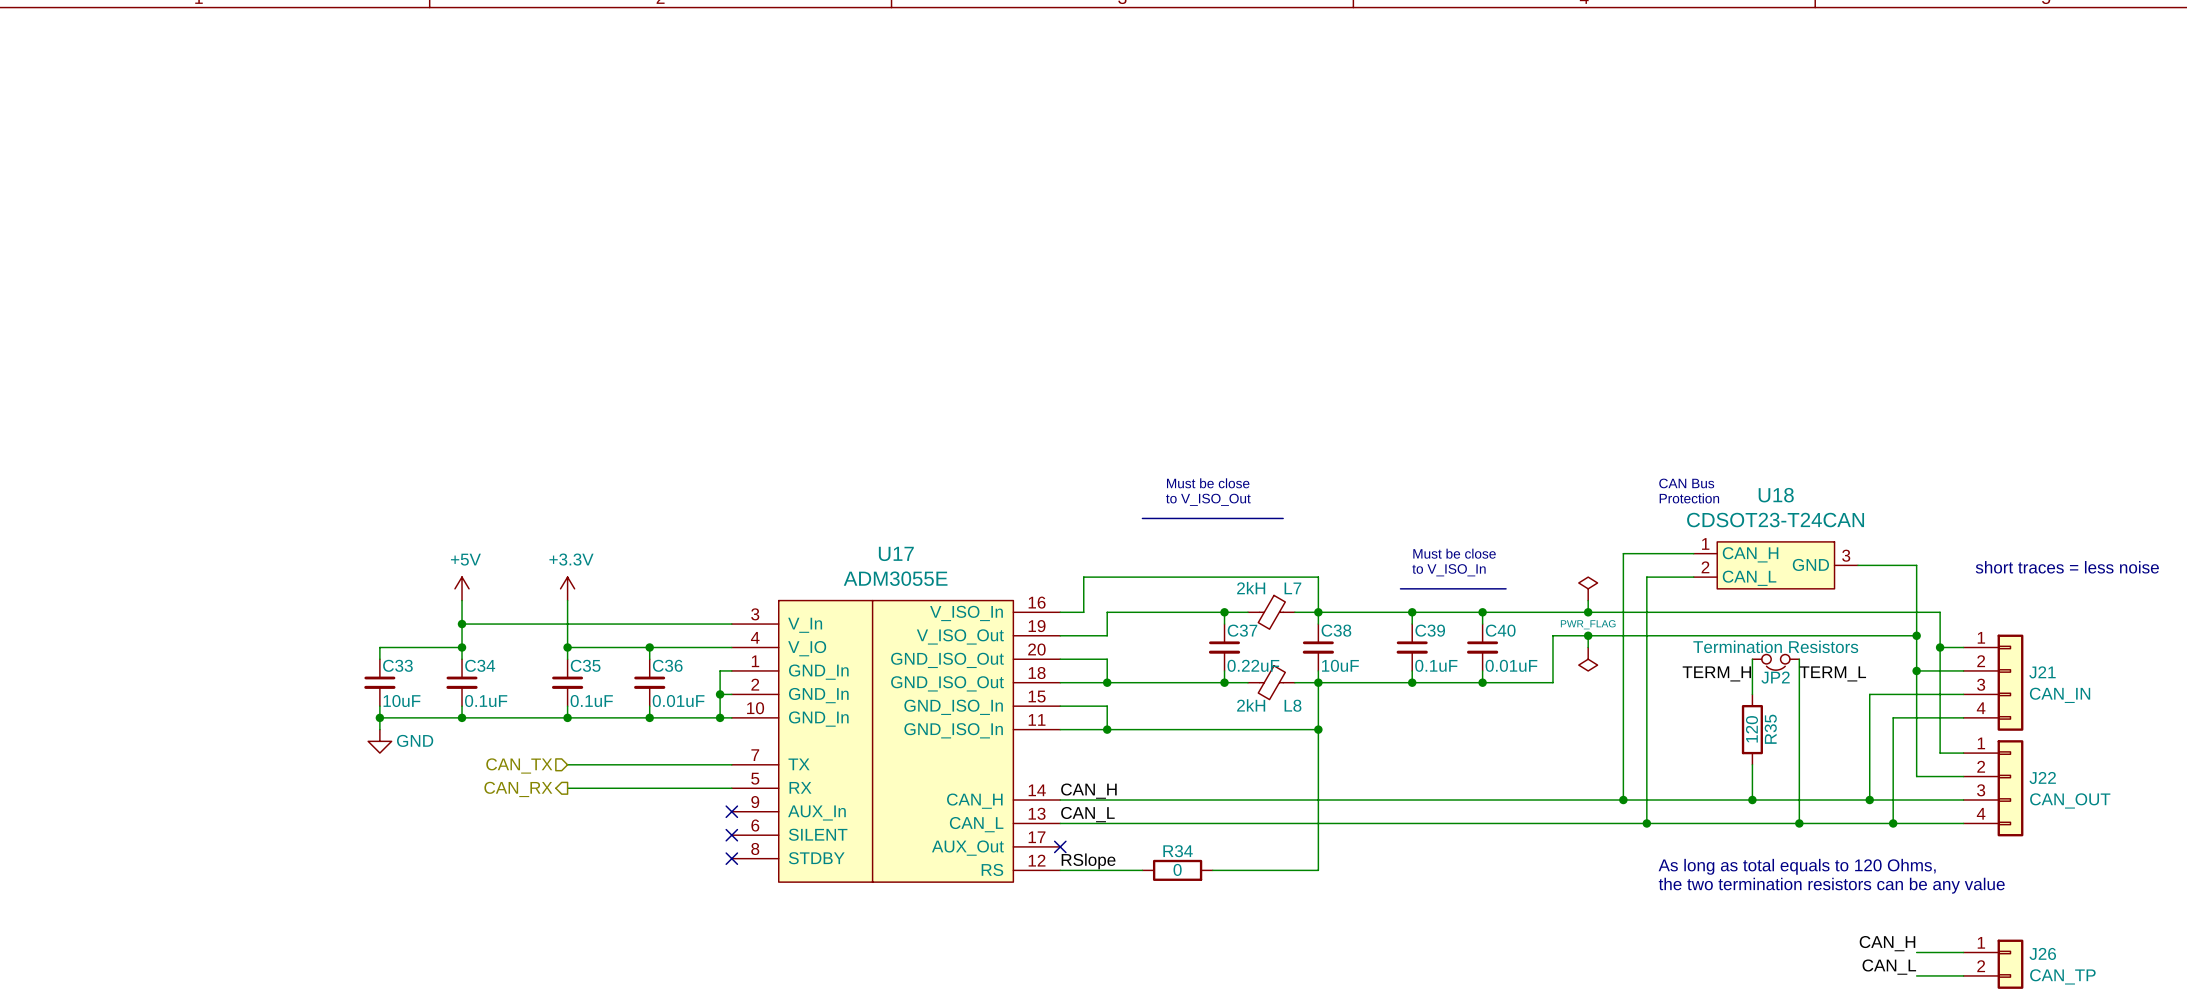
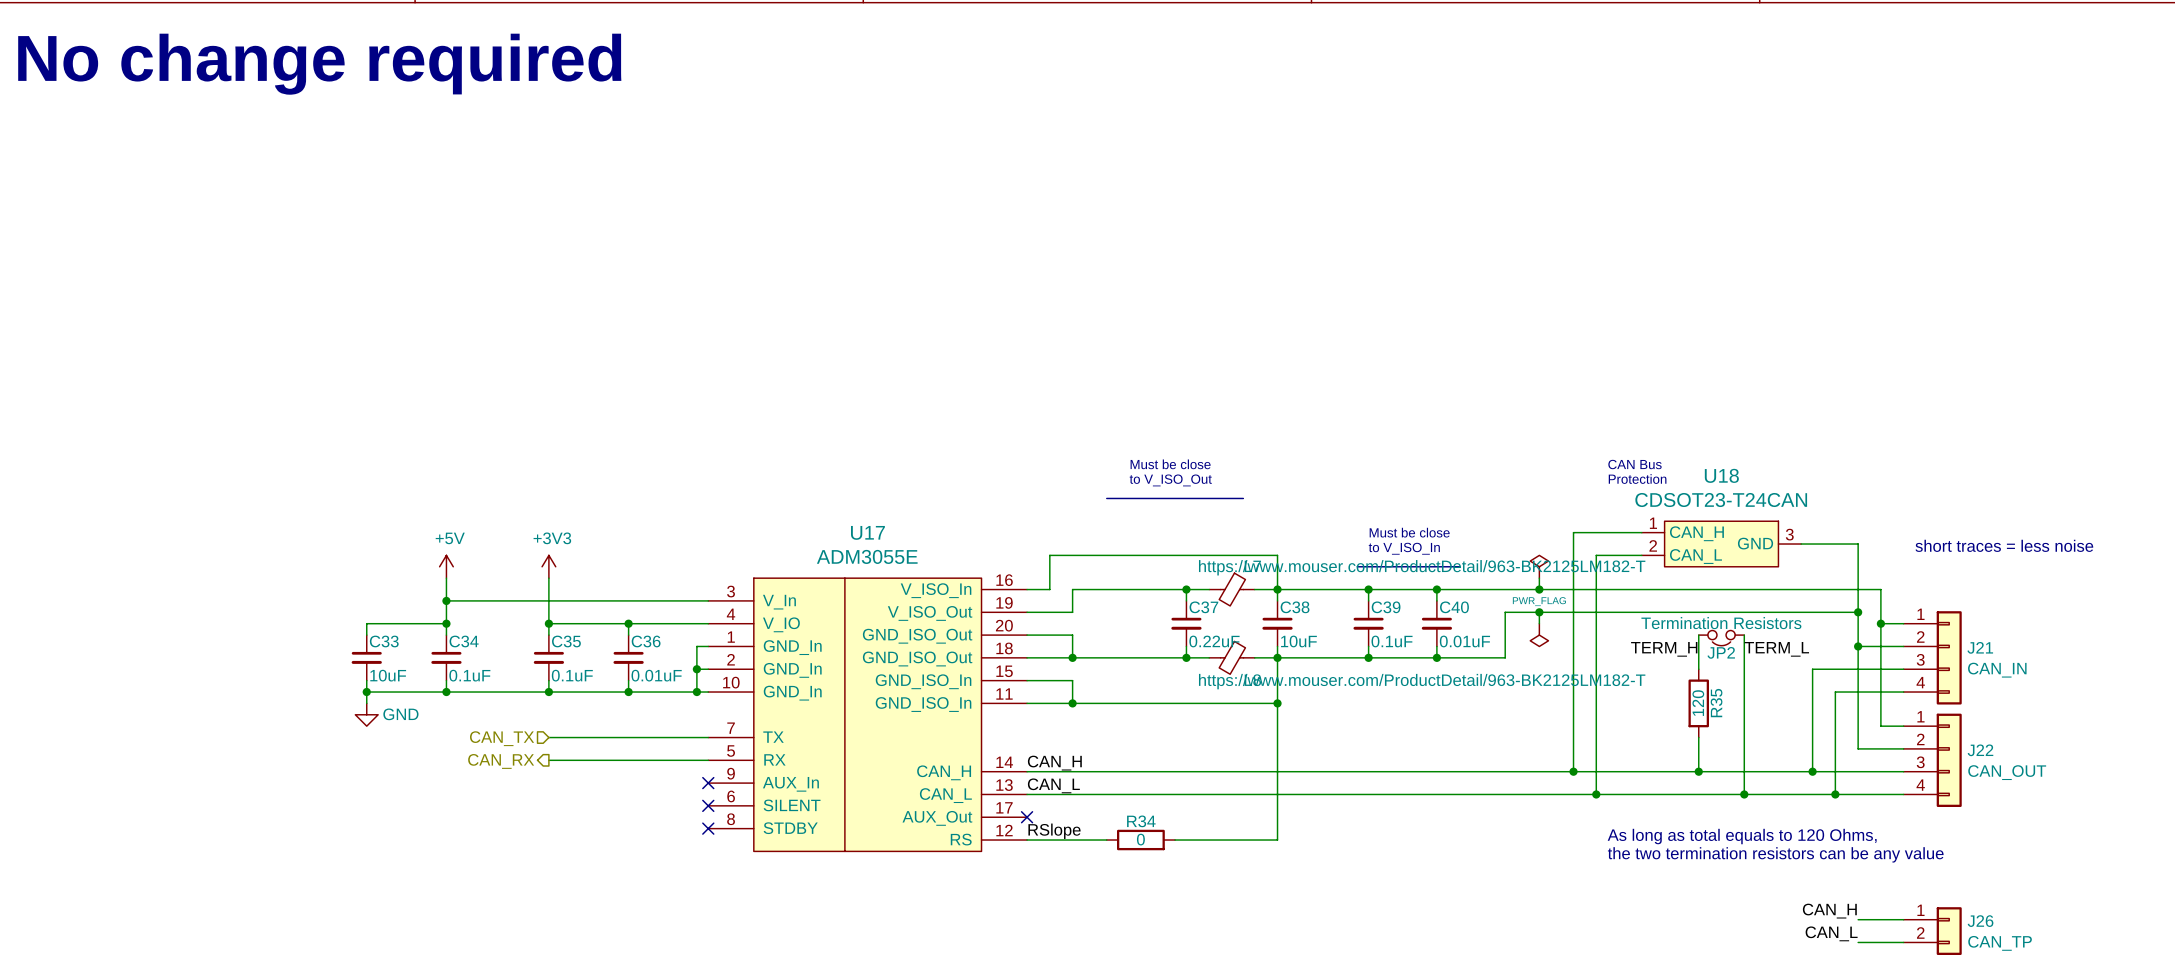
text: none -> No change required (319, 64)
power symbol: +3.3V (567, 588) -> +3V3 (548, 566)
L7 value: 2kH (1251, 588) -> https://www.mouser.com/ProductDetail/963-BK2125LM182-T (1422, 567)
L8 value: 2kH (1251, 705) -> https://www.mouser.com/ProductDetail/963-BK2125LM182-T (1422, 681)

